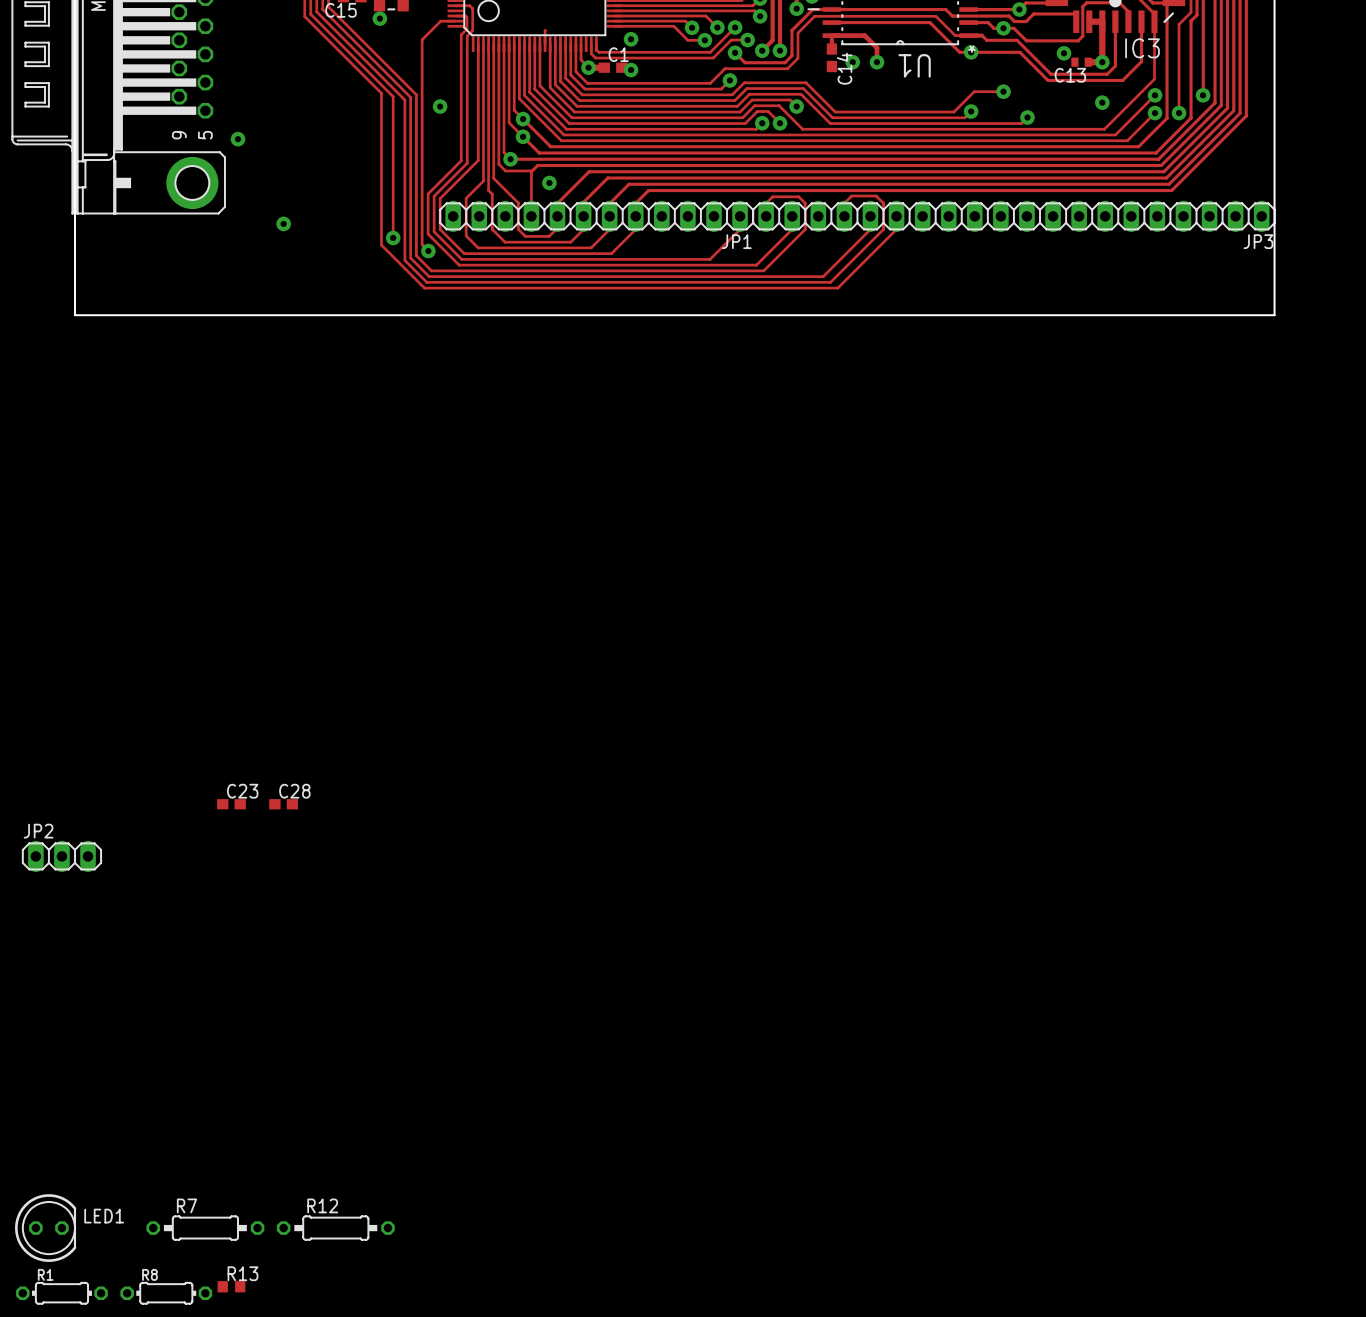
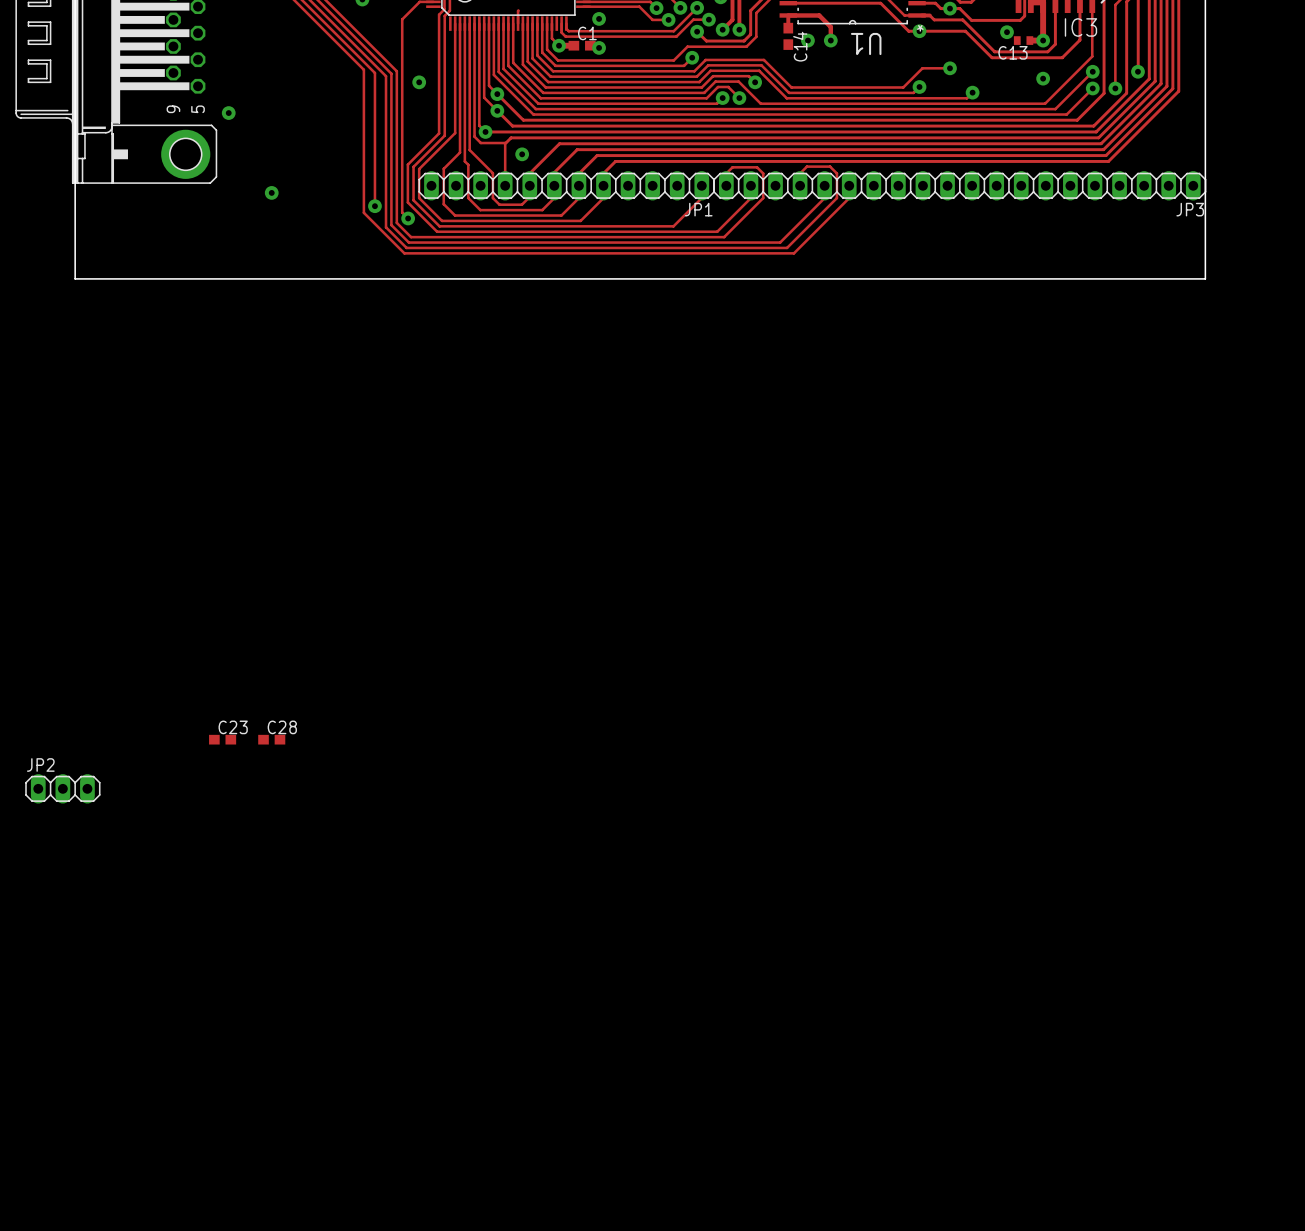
LED1: (45, 1228) -> none
R7: (205, 1228) -> none
R12: (335, 1228) -> none
R13: (231, 1286) -> none
R1: (61, 1293) -> none
R8: (166, 1293) -> none

